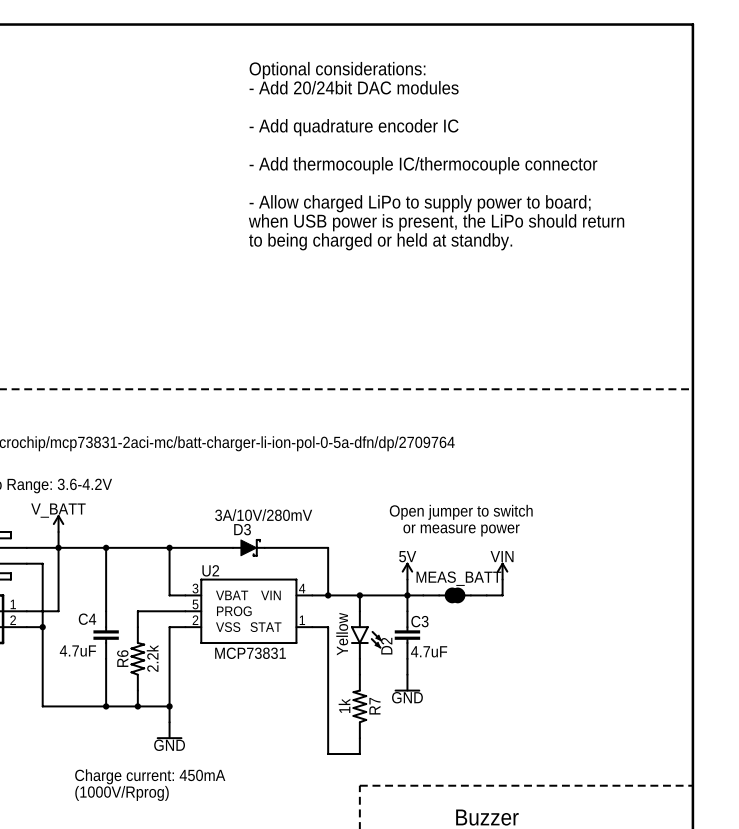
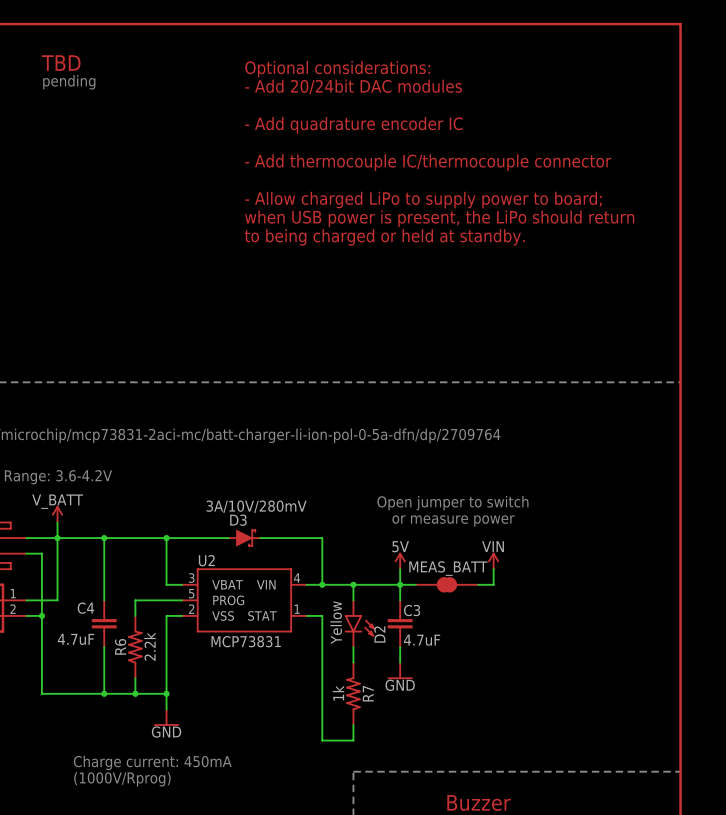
text: none -> TBD (61, 63)
text: none -> pending (69, 82)

